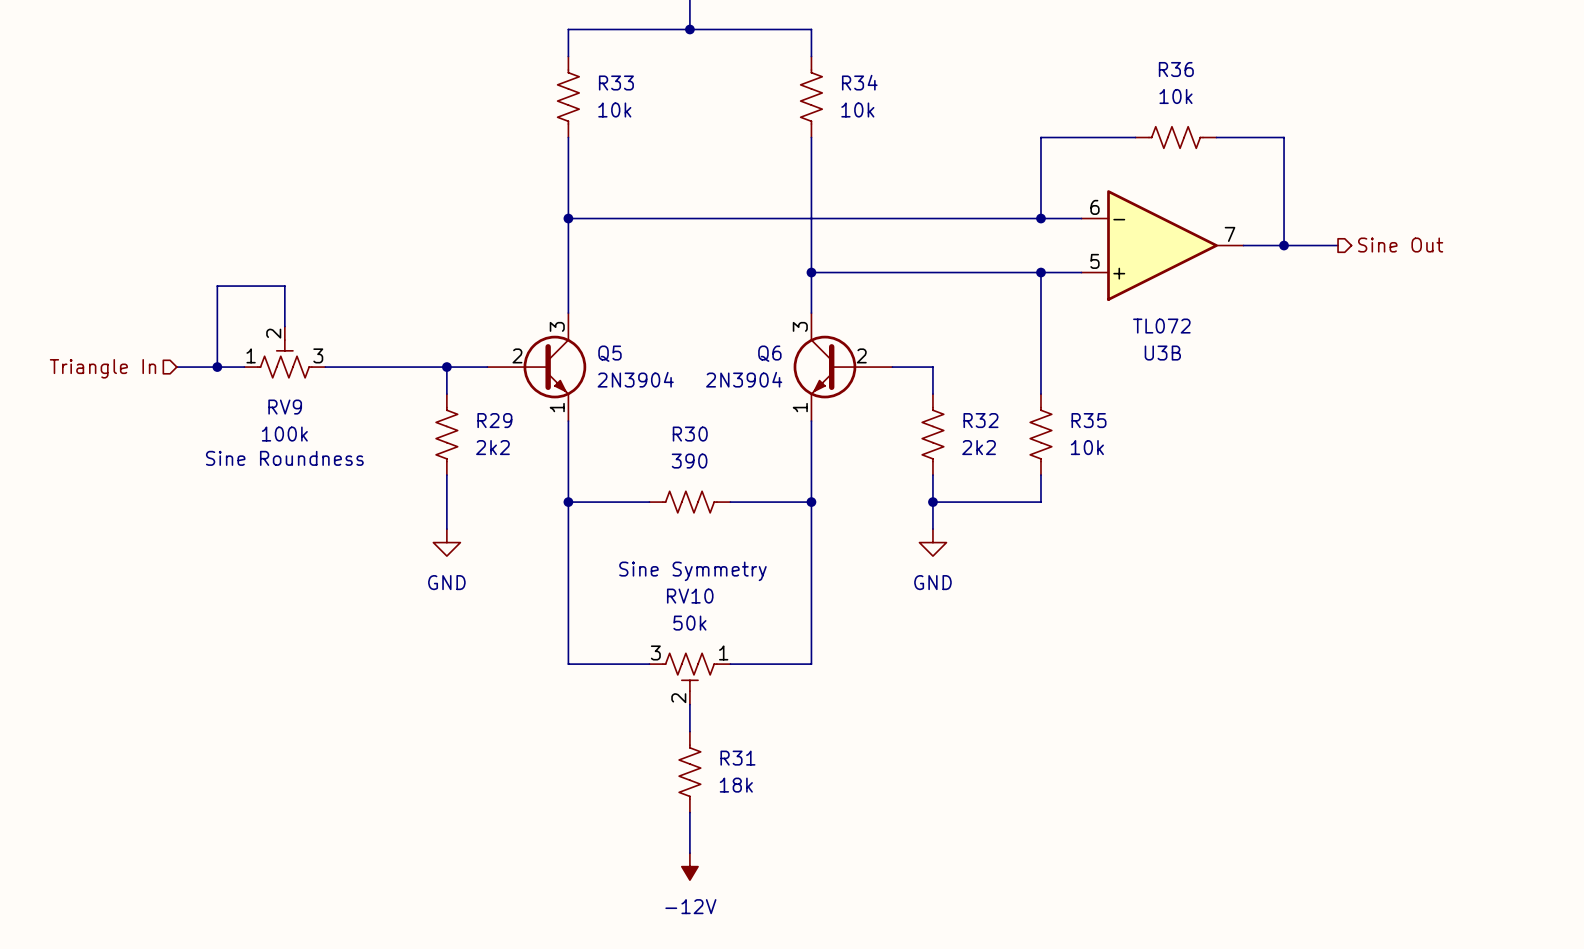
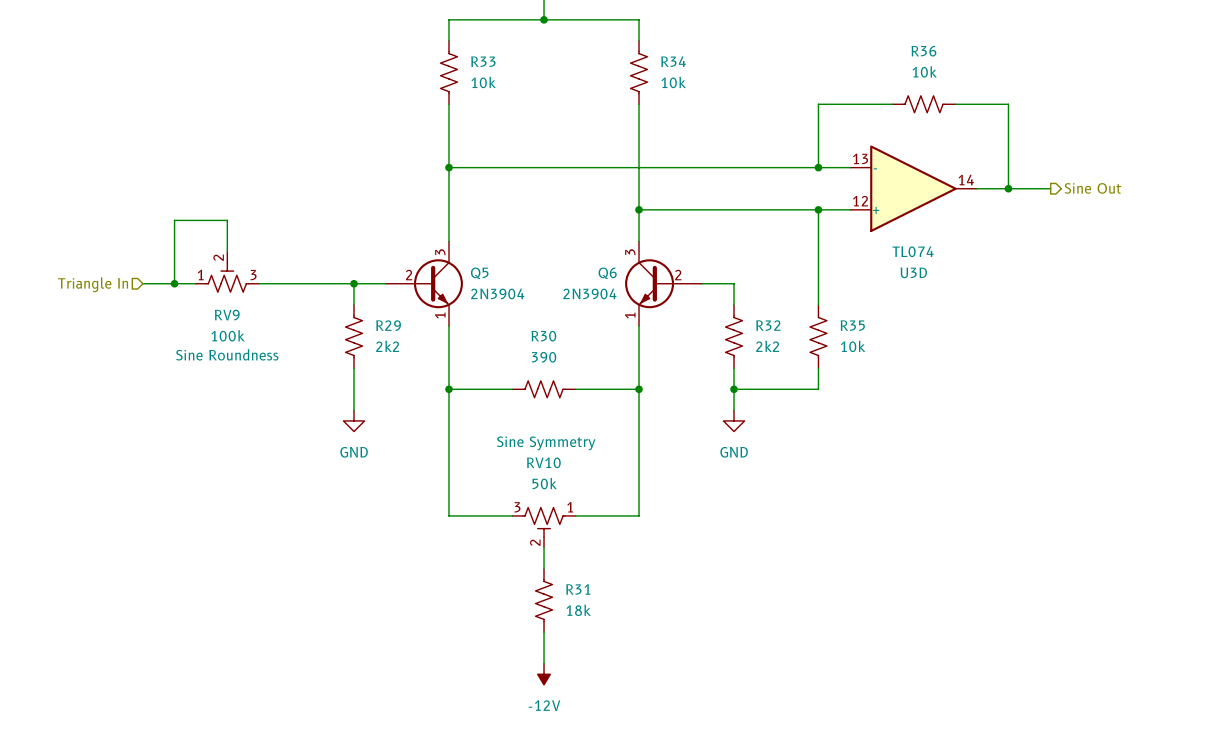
U3B pin number: 6 (1094, 207) -> 13 (860, 158)
U3B pin number: 7 (1230, 234) -> 14 (966, 180)
U3B pin number: 5 (1094, 261) -> 12 (860, 201)
U3B value: TL072 (1161, 326) -> TL074 (913, 251)
U3B name: U3B (1162, 353) -> U3D (913, 272)

